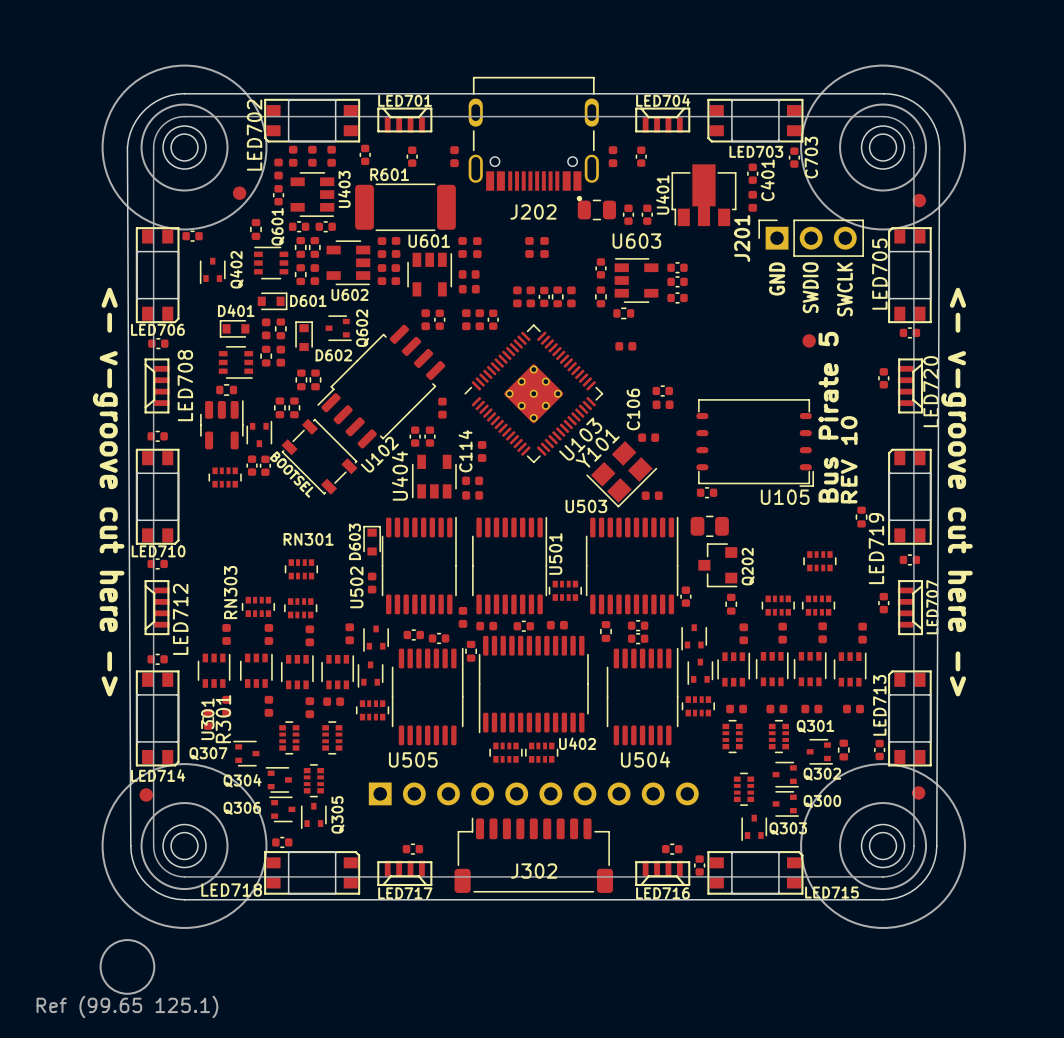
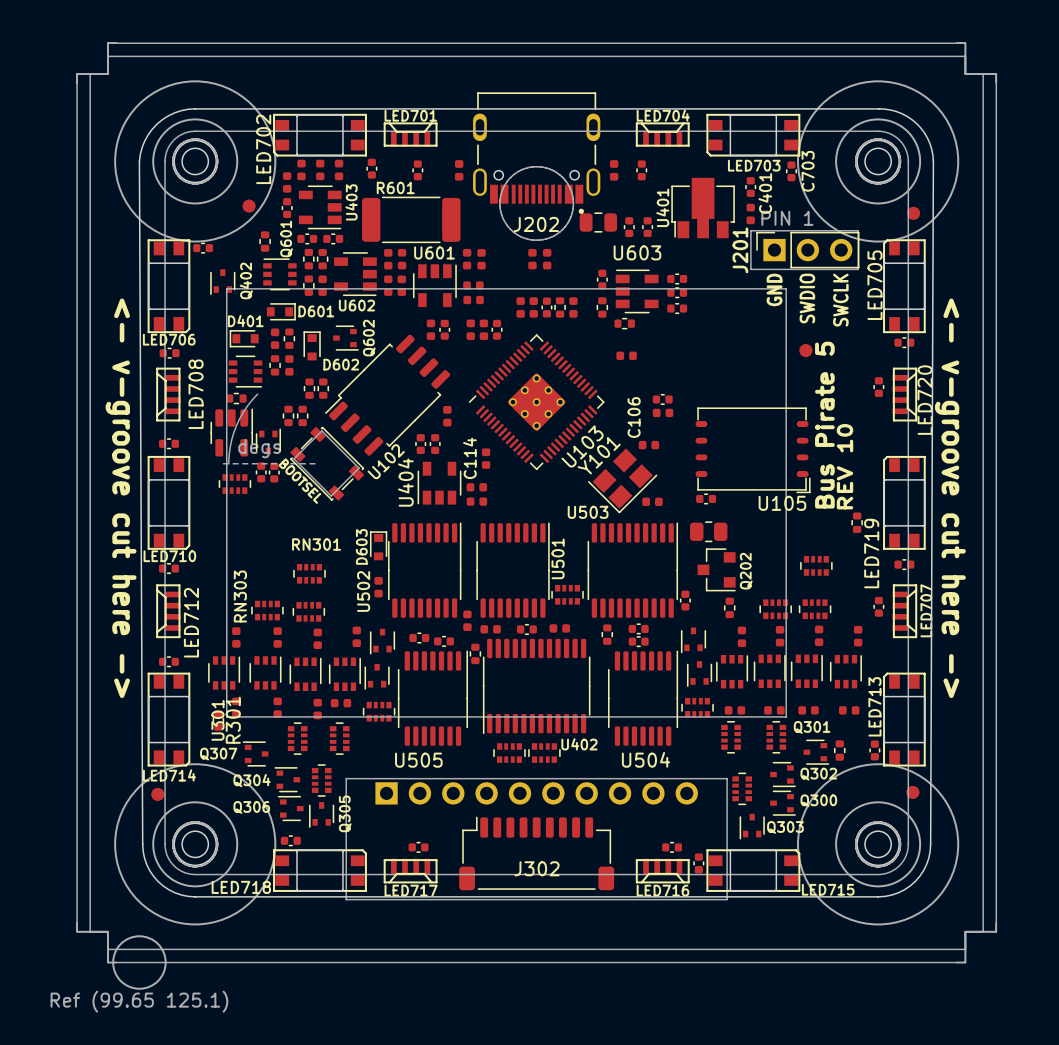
line: none -> (107, 43) (107, 74) (77, 74) (77, 931) (107, 931) (107, 962) (965, 962) (965, 931) (996, 931) (996, 74) (965, 74) (965, 43) (107, 43)
line: none -> (107, 56) (965, 56)
line: none -> (90, 74) (90, 931)
line: none -> (983, 74) (983, 931)
line: none -> (193, 139) (185, 141) (178, 147) (174, 154) (172, 162) (175, 172) (180, 178) (188, 182) (196, 183) (204, 181) (212, 175) (216, 168) (217, 160) (214, 150) (209, 144) (202, 140) (193, 139)
line: none -> (876, 139) (868, 141) (860, 147) (856, 154) (855, 162) (858, 172) (863, 178) (871, 182) (879, 183) (887, 181) (895, 175) (899, 168) (900, 160) (897, 150) (892, 144) (885, 140) (876, 139)
line: none -> (536, 166) (550, 169) (561, 176) (569, 187) (573, 203) (569, 219) (561, 230) (550, 237) (536, 240) (523, 237) (511, 230) (503, 219) (499, 203) (503, 187) (511, 176) (523, 169) (536, 166)
text: none -> PIN 1 (787, 218)
line: none -> (750, 230) (858, 230) (858, 269) (750, 269) (750, 230)
line: none -> (226, 288) (226, 716) (786, 716) (786, 288) (226, 288)
line: none -> (257, 394) (247, 405) (236, 426) (229, 448) (228, 463)
line: none -> (321, 430) (294, 458) (331, 495) (359, 468) (321, 430)
text: none -> degs (259, 448)
line: none -> (223, 463) (317, 463)
line: none -> (346, 778) (346, 899) (727, 899) (727, 778) (346, 778)
line: none -> (193, 822) (202, 823) (209, 827) (214, 833) (217, 842) (216, 851) (212, 858) (205, 863) (196, 866) (188, 865) (180, 861) (175, 855) (172, 845) (174, 837) (178, 830) (184, 824) (193, 822)
line: none -> (876, 822) (885, 823) (892, 827) (897, 833) (900, 842) (899, 851) (895, 858) (888, 863) (879, 866) (871, 865) (863, 861) (858, 855) (855, 845) (856, 837) (860, 830) (867, 824) (876, 822)
line: none -> (107, 949) (965, 949)

